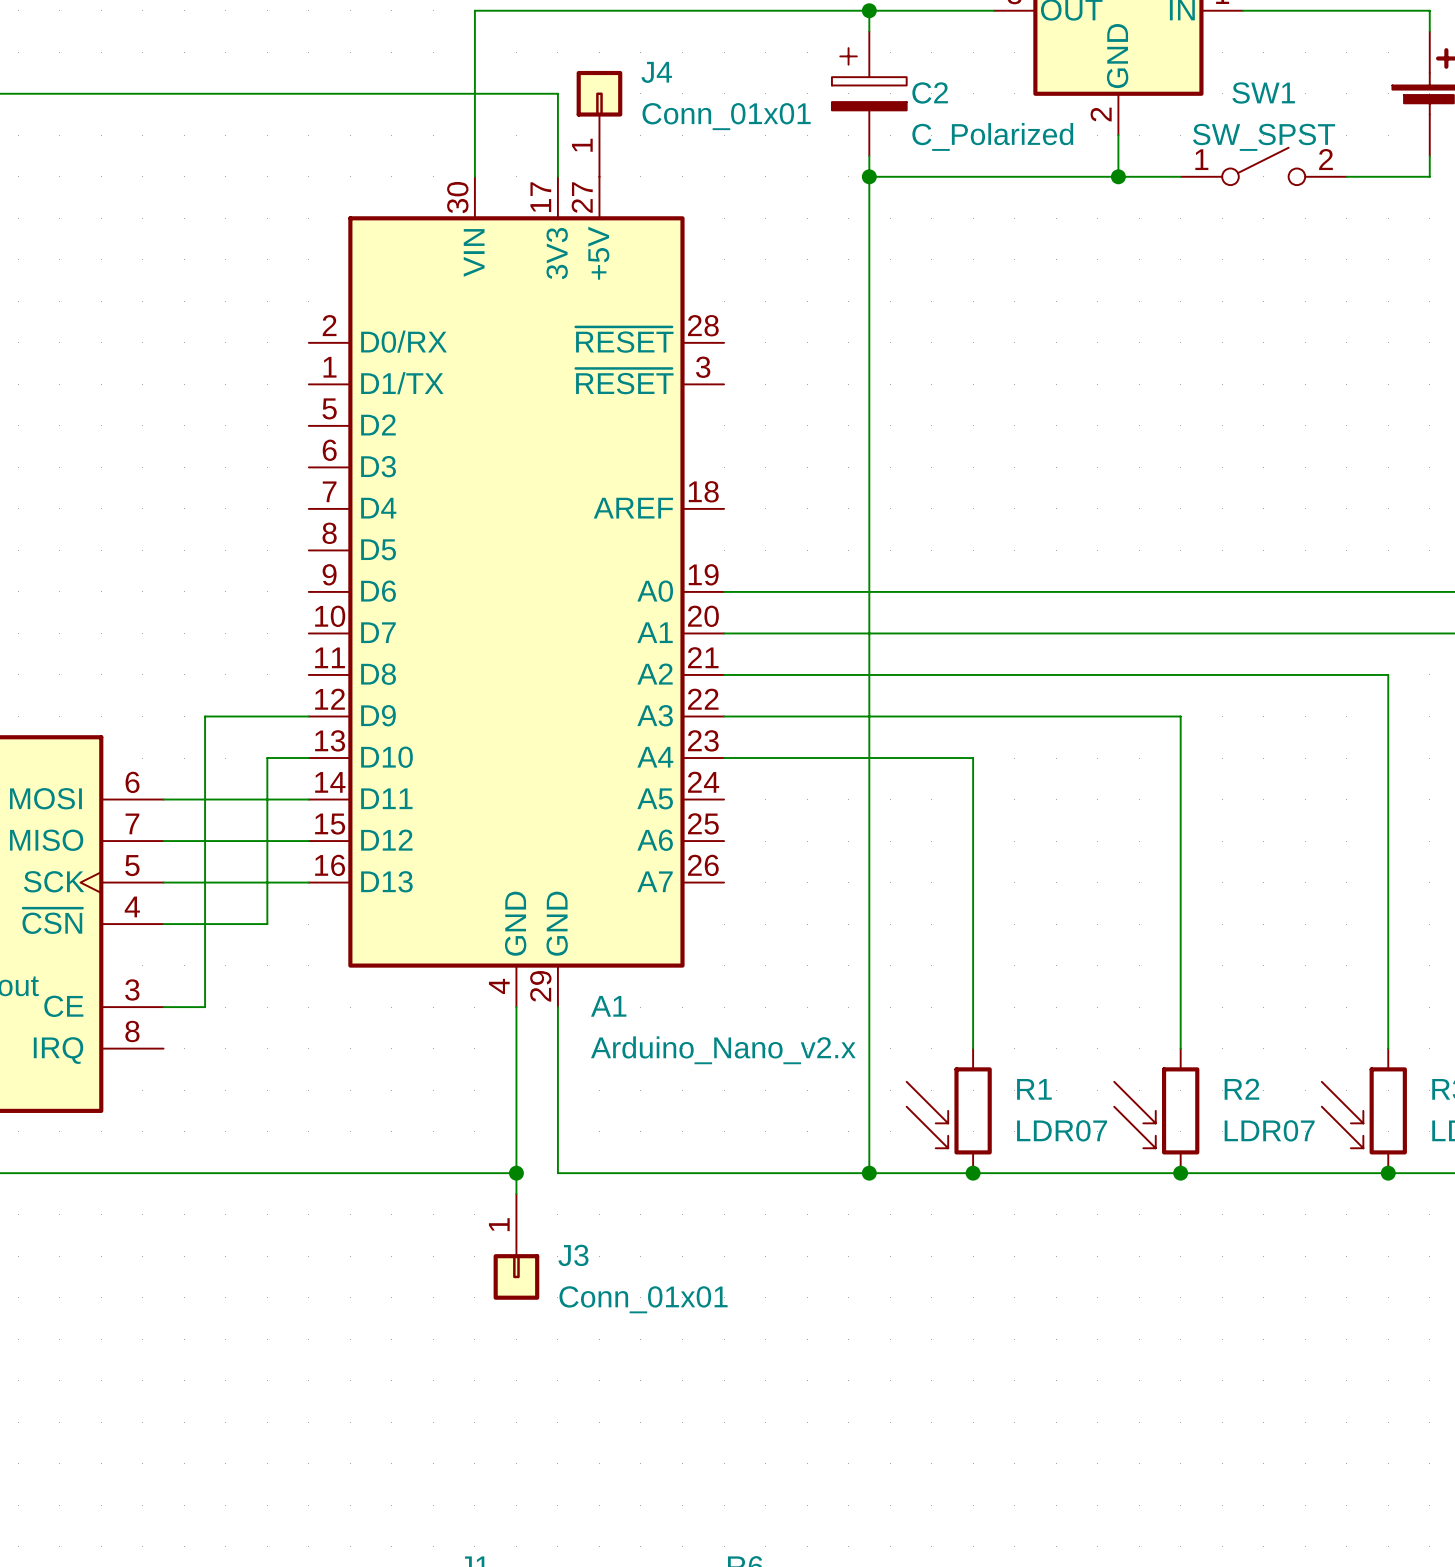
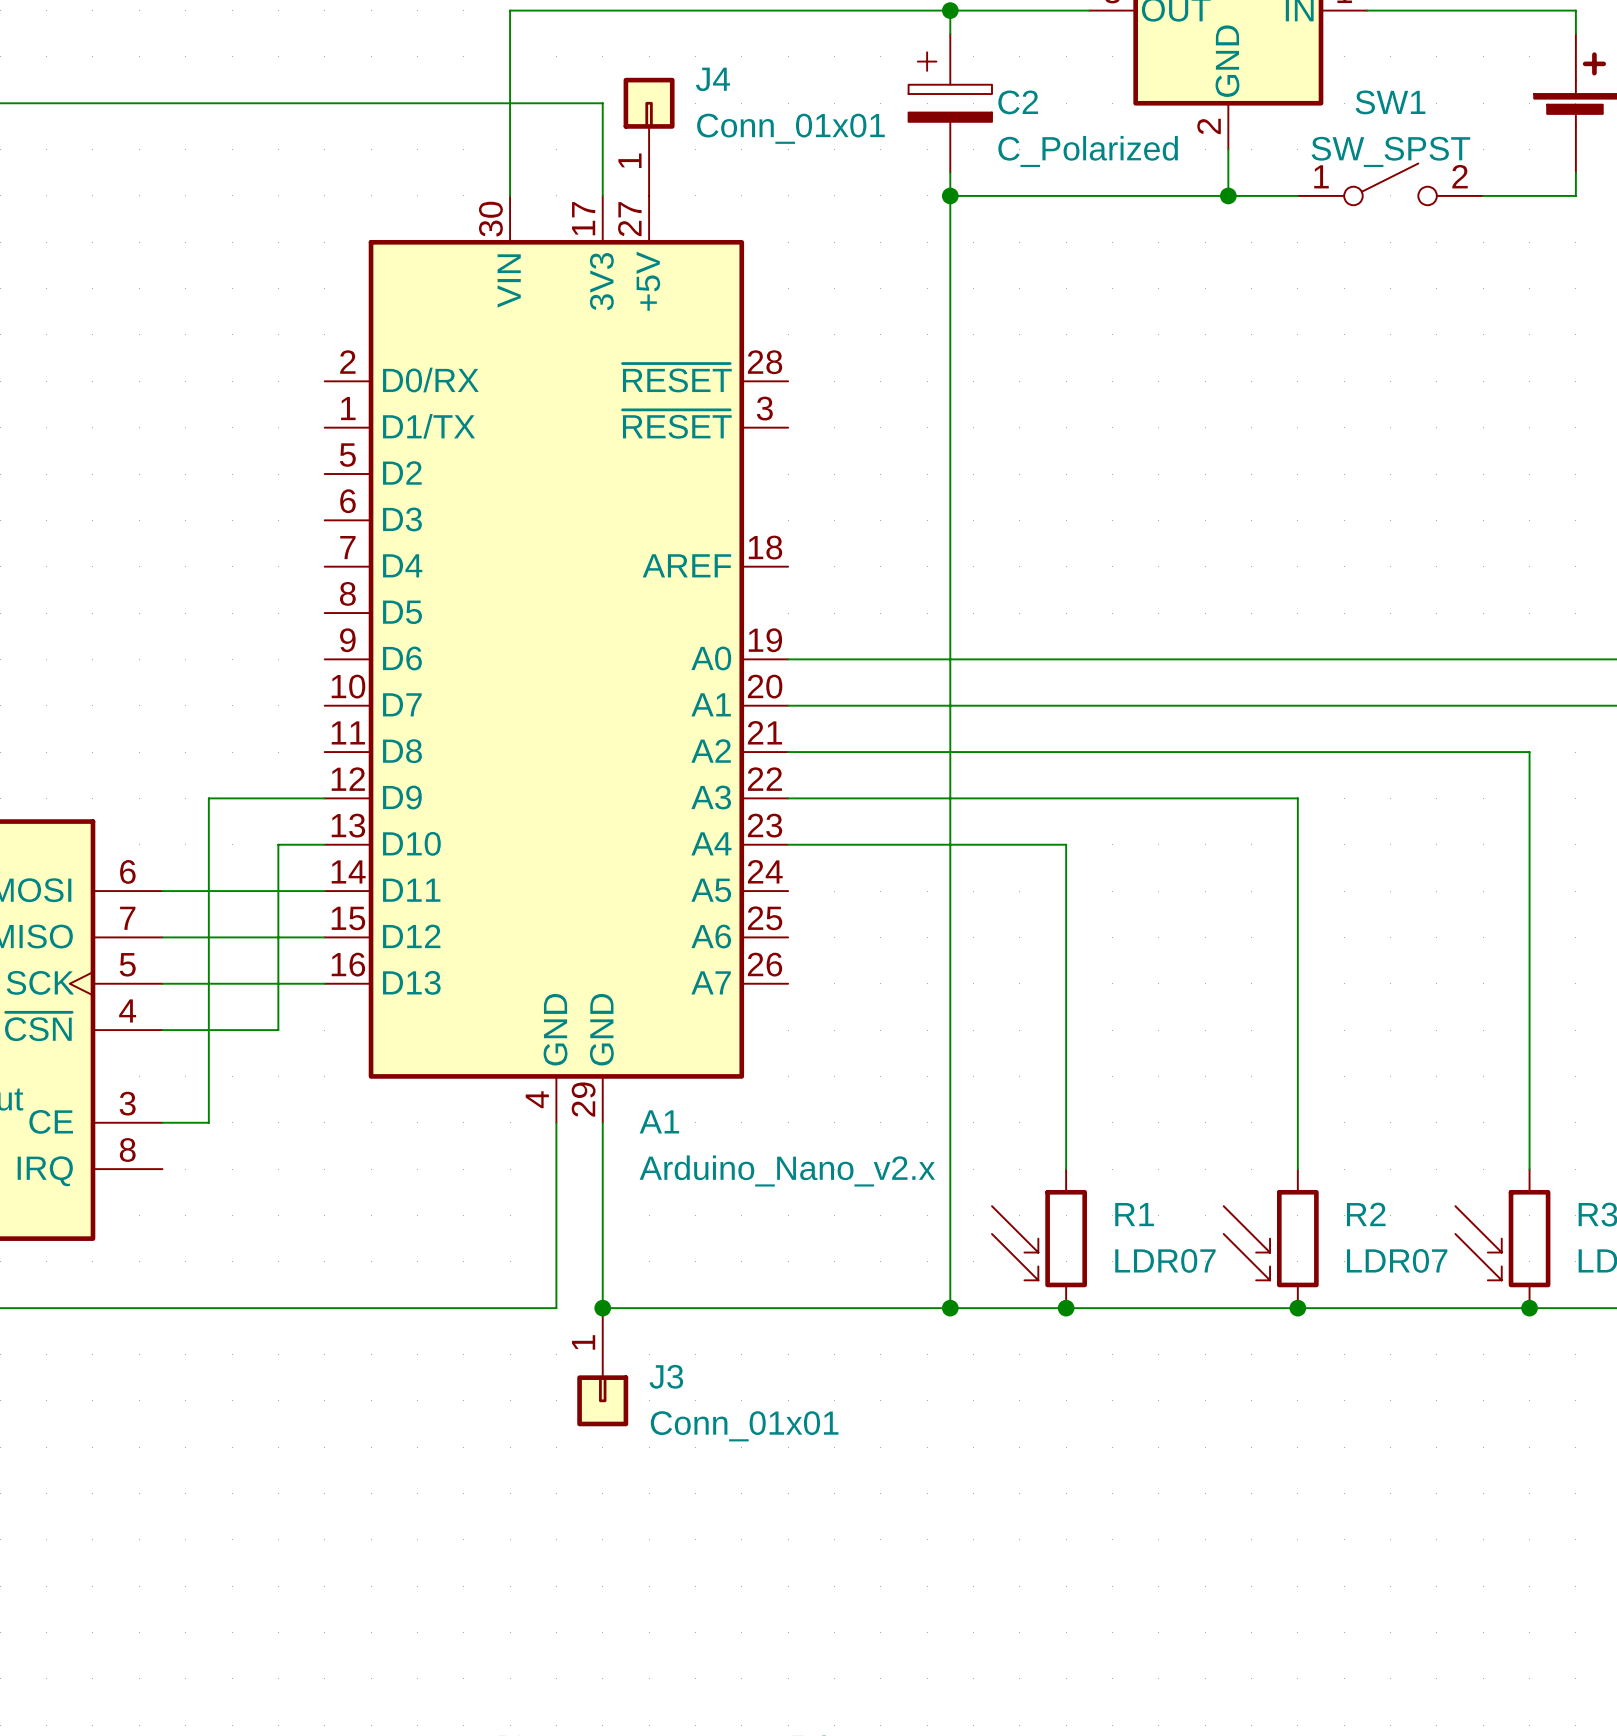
wire: (516, 1173) (516, 1193) -> none
junction position: (516, 1173) -> (602, 1308)
J3 position: (516, 1246) -> (602, 1367)

